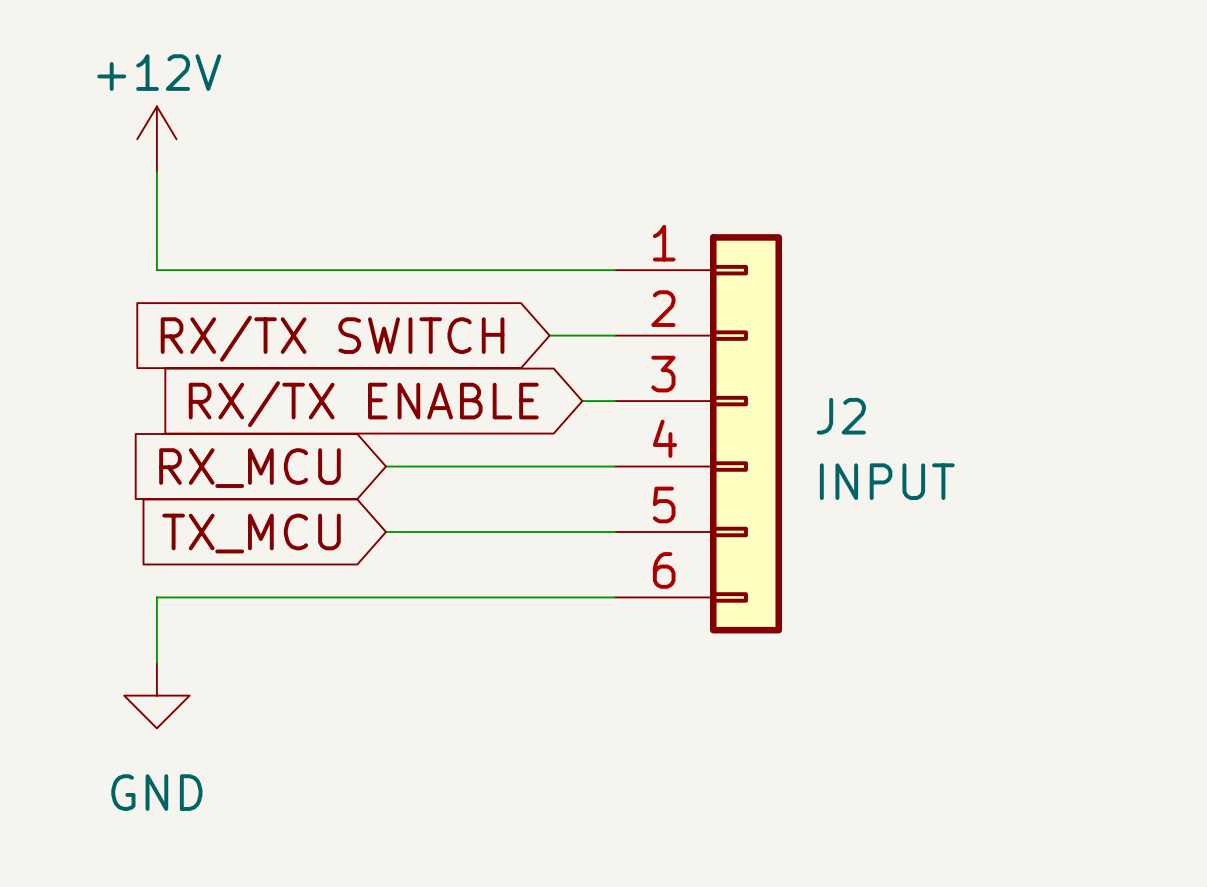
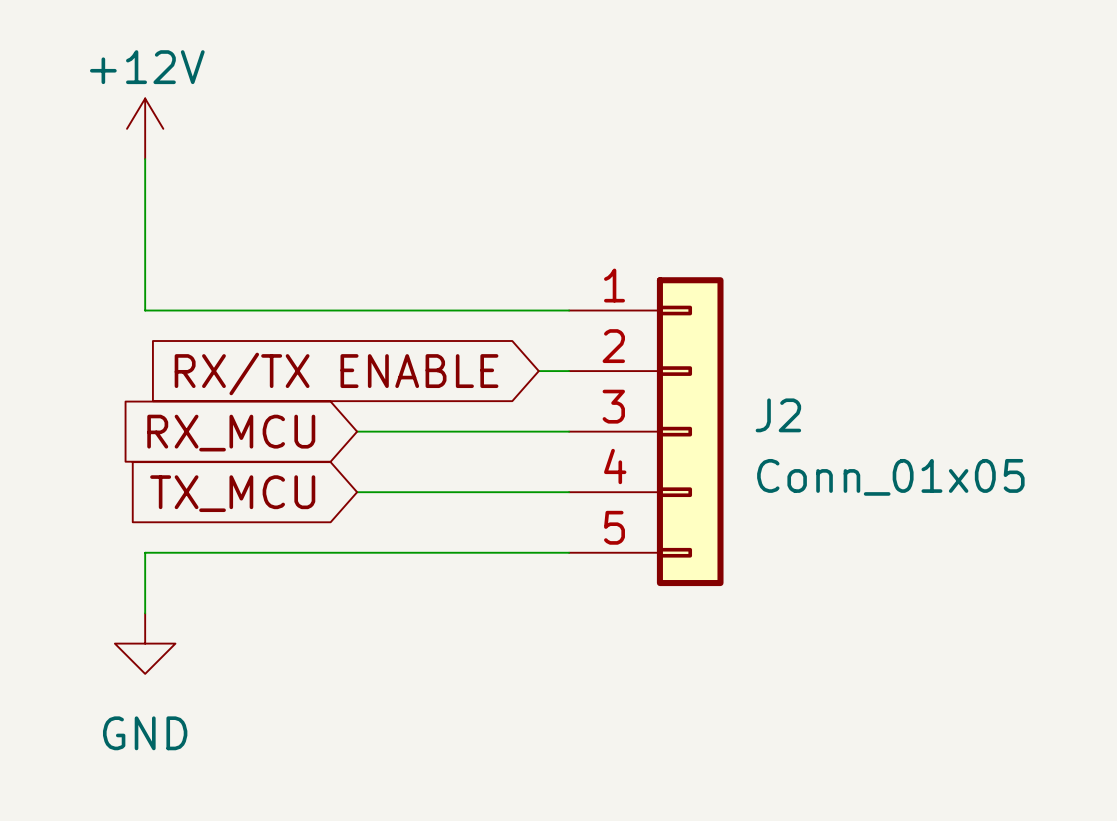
J2 symbol: [615, 234, 783, 634] -> [569, 277, 724, 587]
wire: (156, 270) (615, 270) -> (145, 249) (145, 310) (508, 310)
global label: RX/TX SWITCH (332, 338) -> none
J2 value: INPUT (887, 481) -> Conn_01x05 (890, 477)

